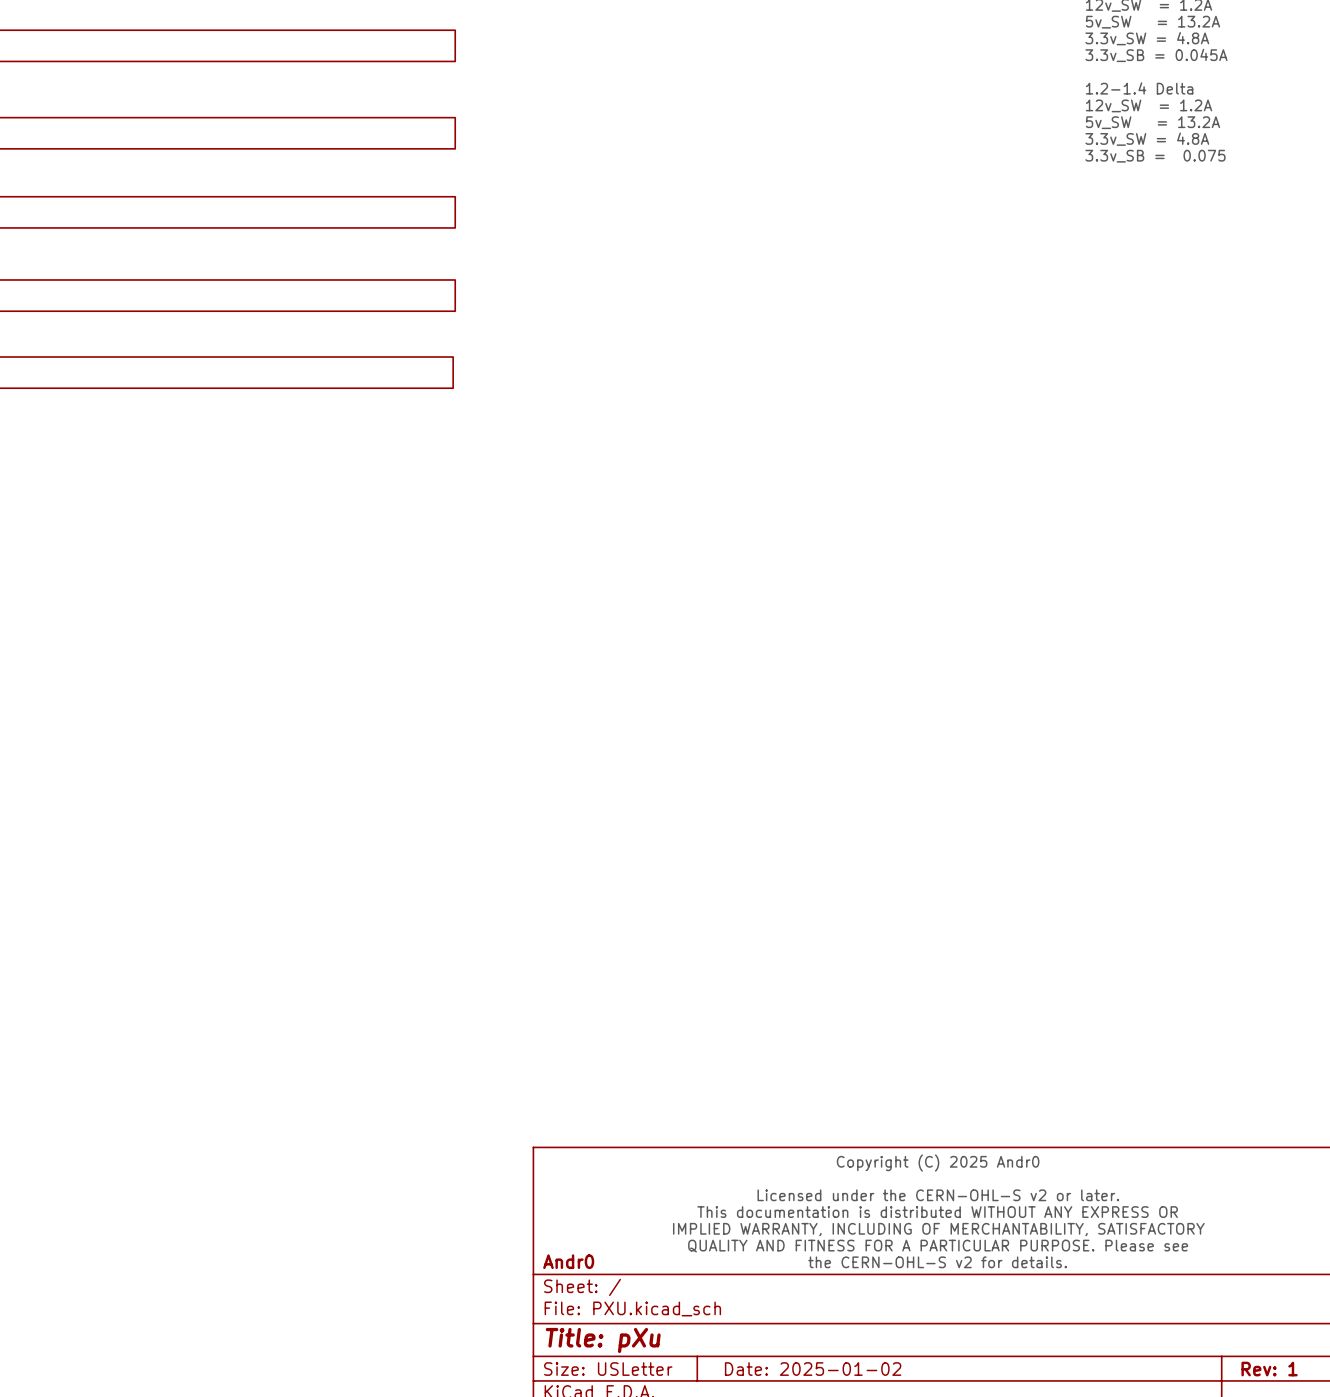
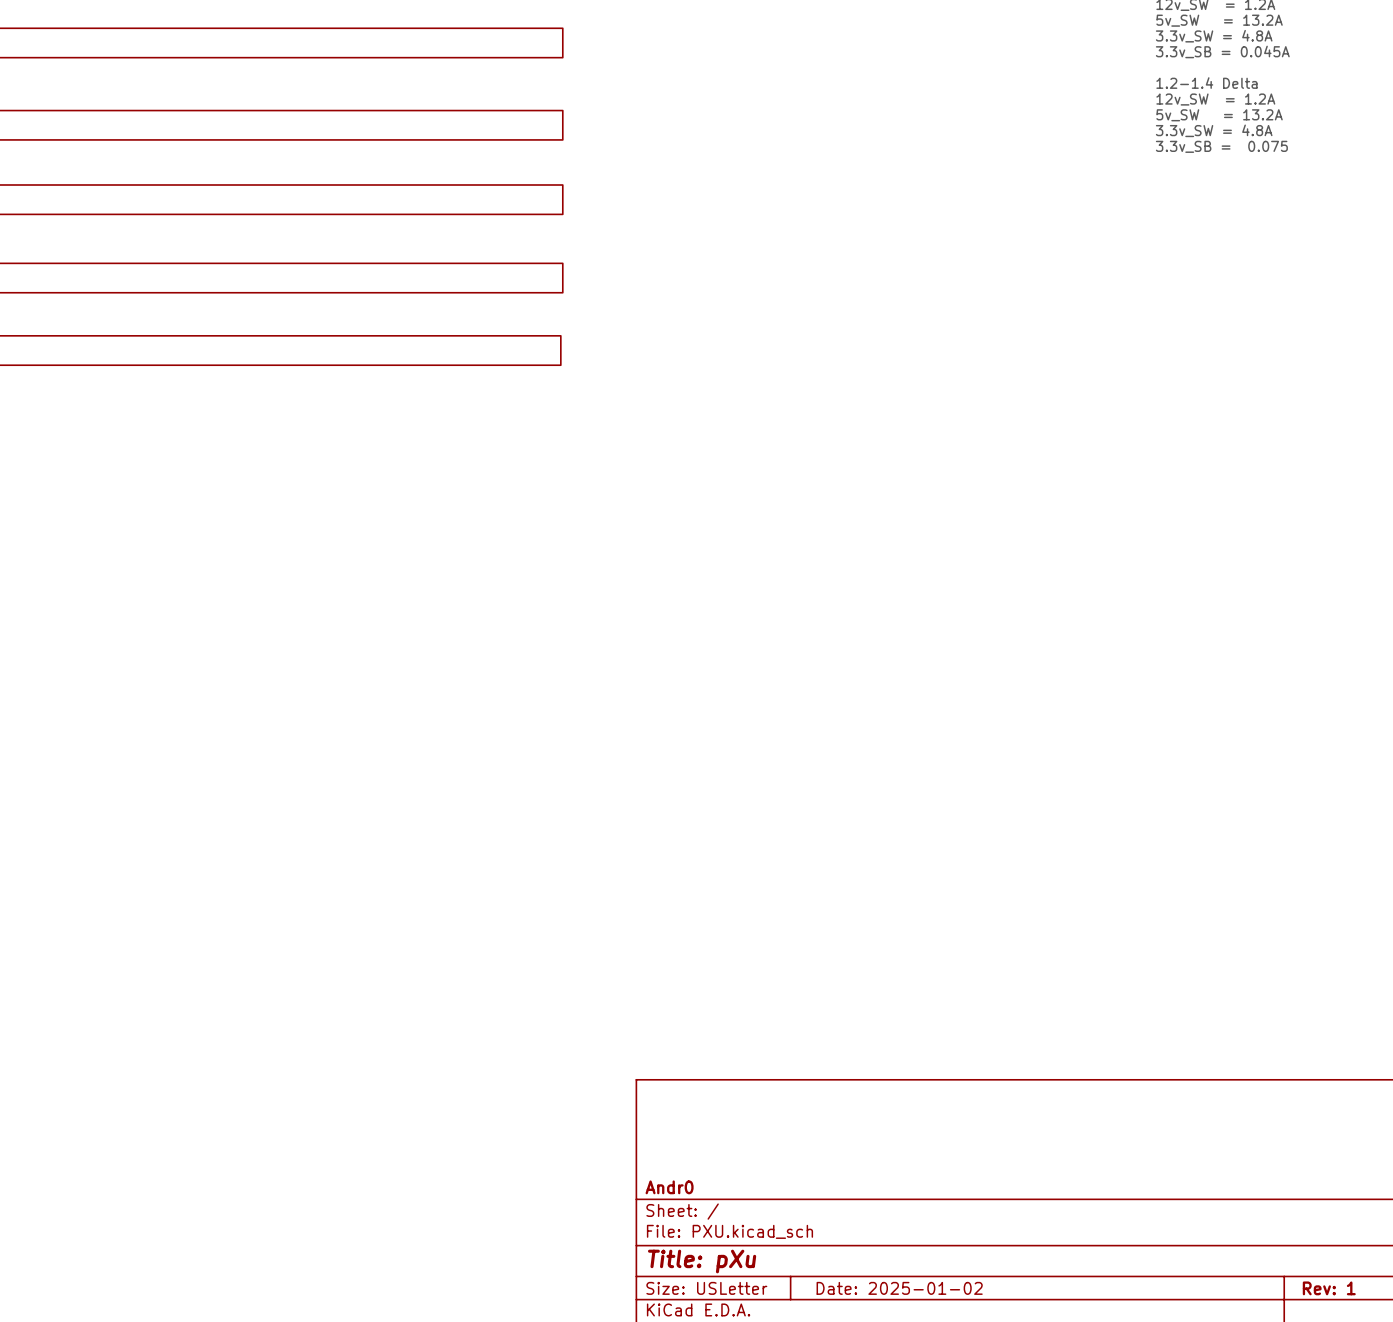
text: Copyright (C) 2025 Andr0 (938, 1163) -> none
text: Licensed under the CERN-OHL-S v2 or later. (938, 1195) -> none
text: This documentation is distributed WITHOUT ANY EXPRESS OR (937, 1212) -> none
text: IMPLIED WARRANTY, INCLUDING OF MERCHANTABILITY, SATISFACTORY (938, 1229) -> none
text: QUALITY AND FITNESS FOR A PARTICULAR PURPOSE. Please see (938, 1246) -> none
text: the CERN-OHL-S v2 for details. (937, 1262) -> none

